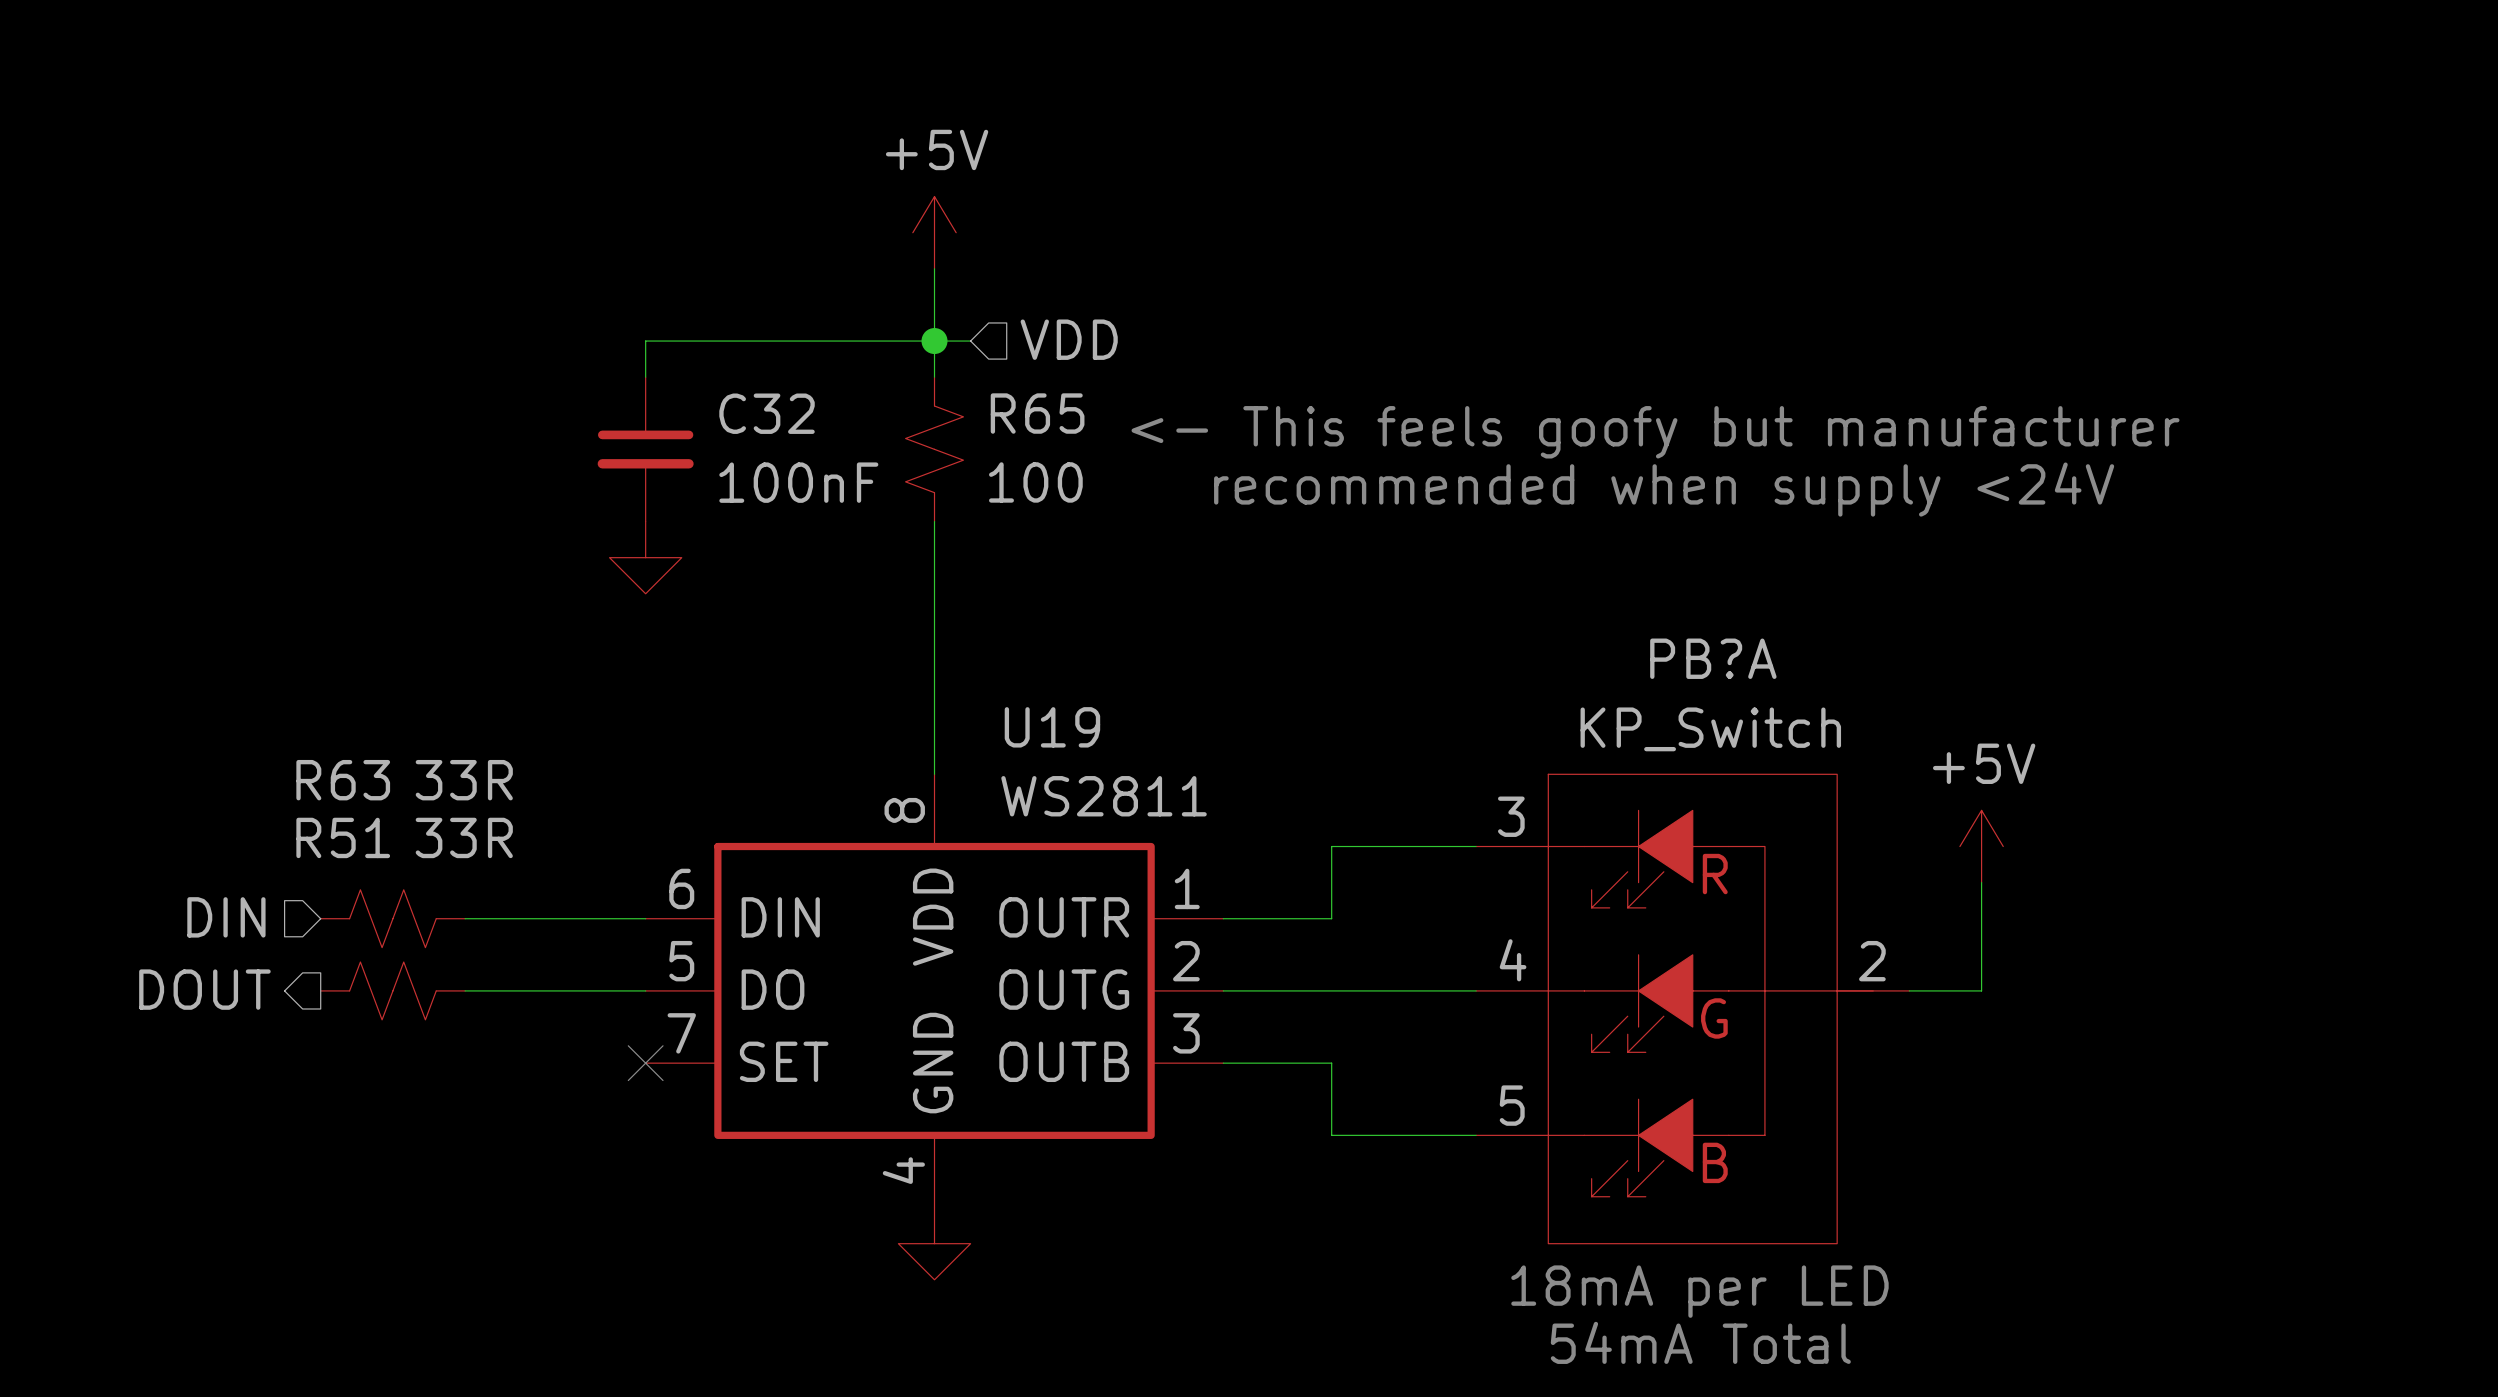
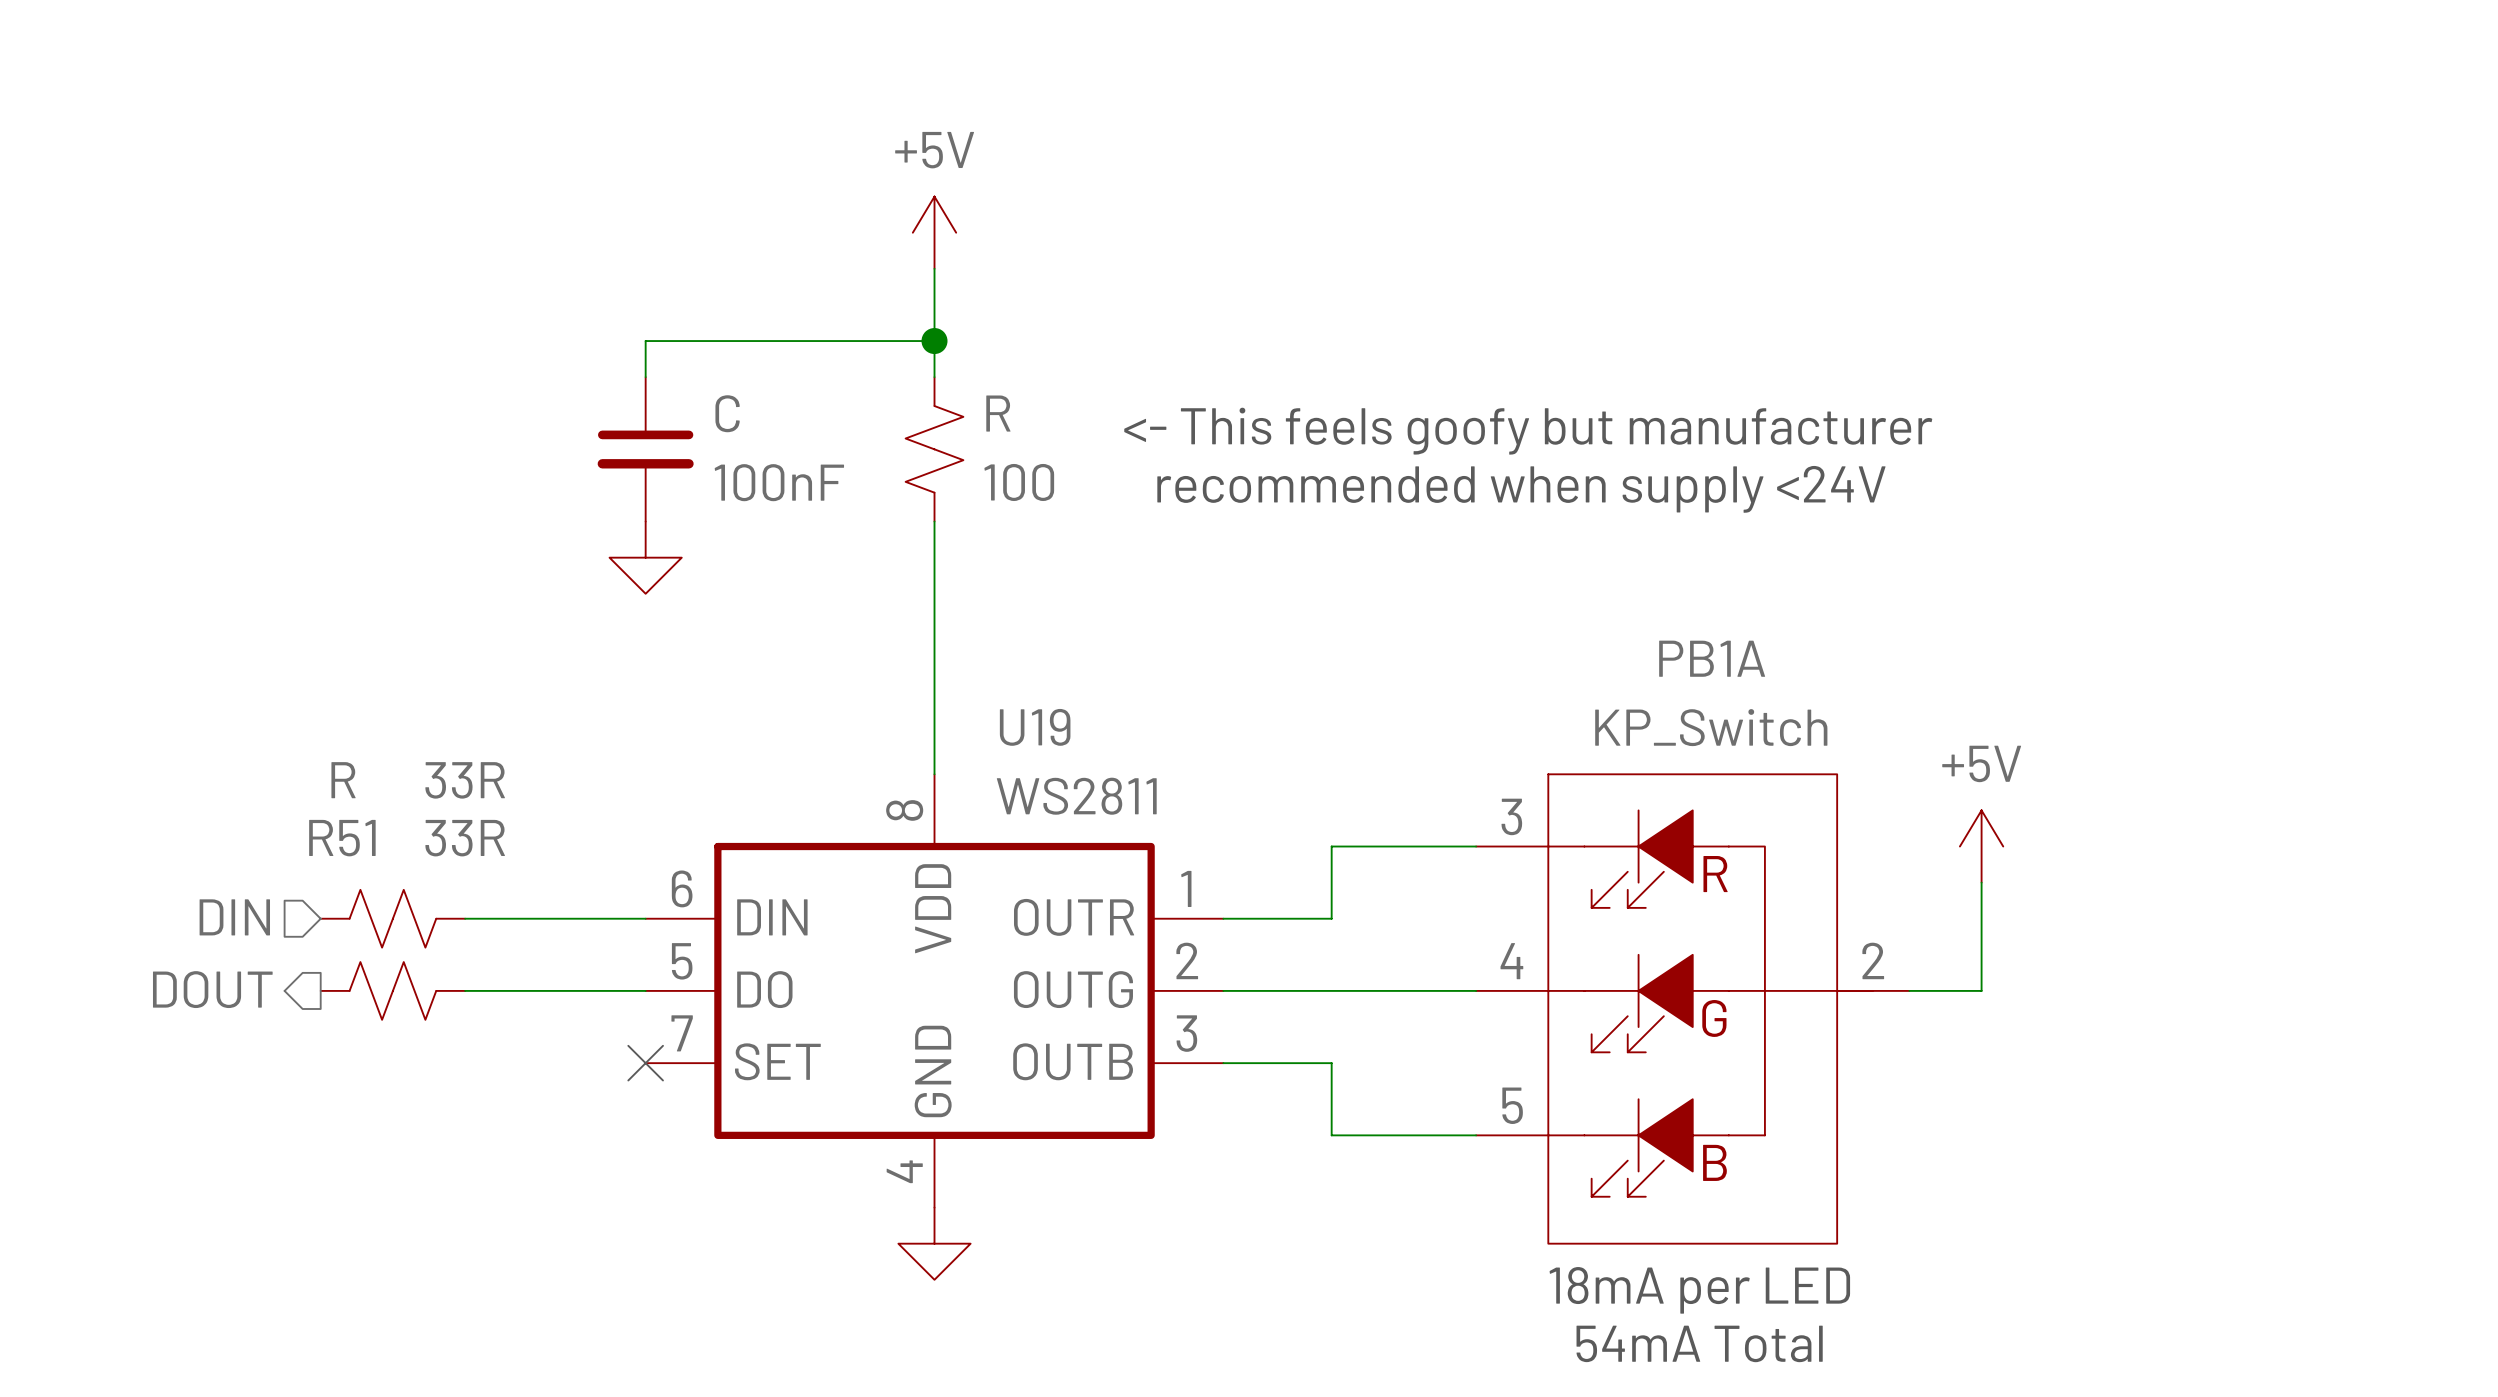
hierarchical label: VDD (1069, 339) -> none
wire: (934, 341) (970, 341) -> none
C32 name: C32 (767, 413) -> C (727, 413)
R65 name: R65 (1037, 413) -> R (998, 413)
PB?A name: PB?A (1713, 658) -> PB1A (1712, 658)
R63 name: R63 (343, 780) -> R (343, 780)

